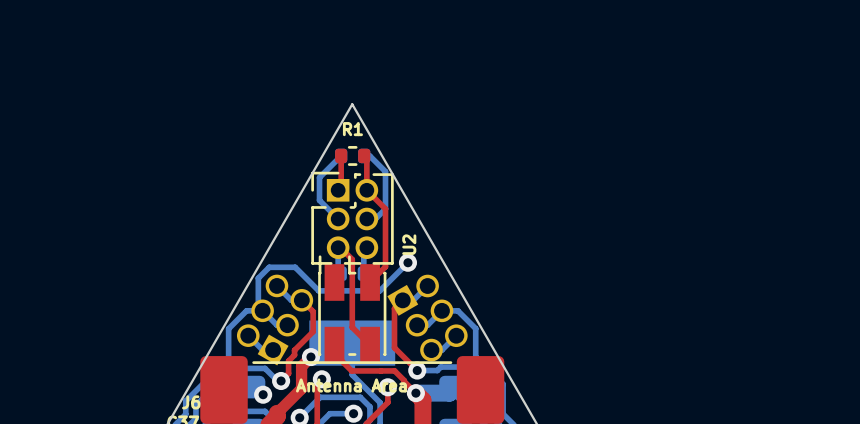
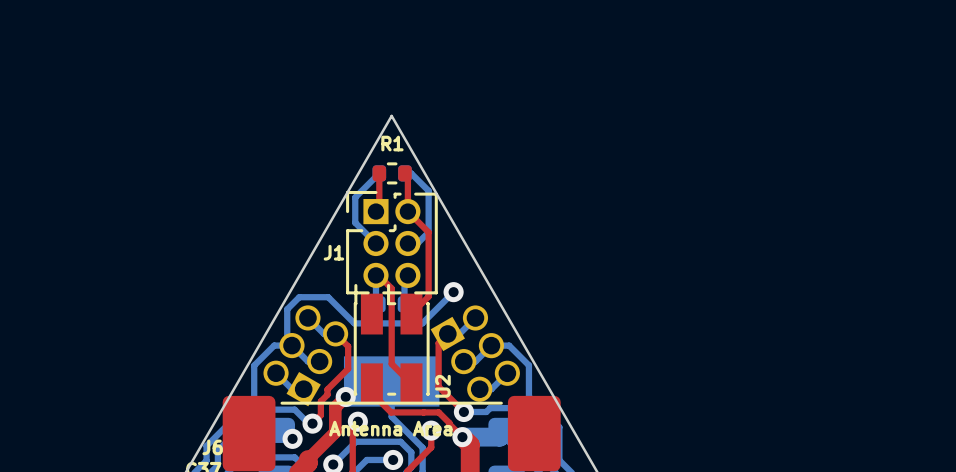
J1 name: none -> J1 (333, 252)
U2 name position: U2 (409, 244) -> U2 (442, 386)

